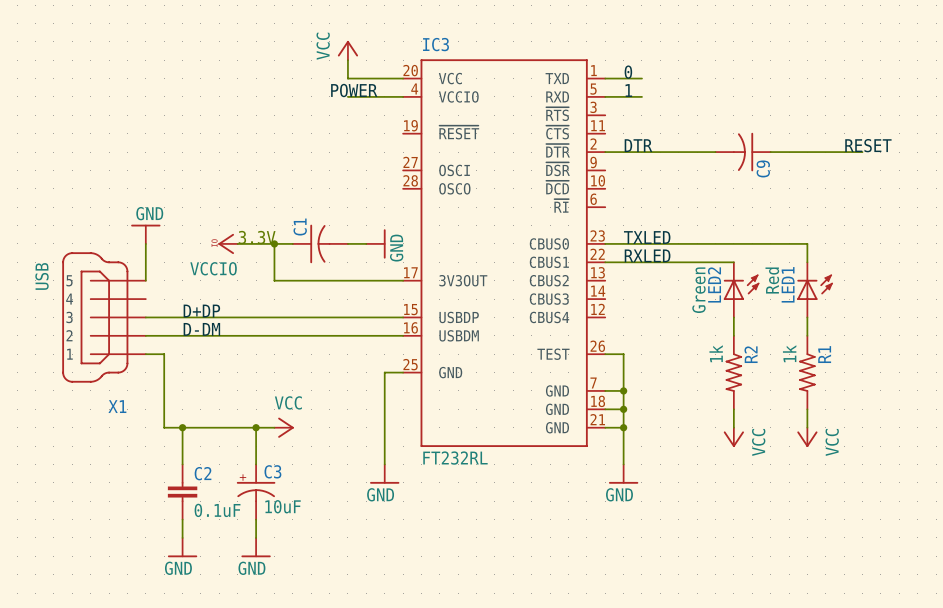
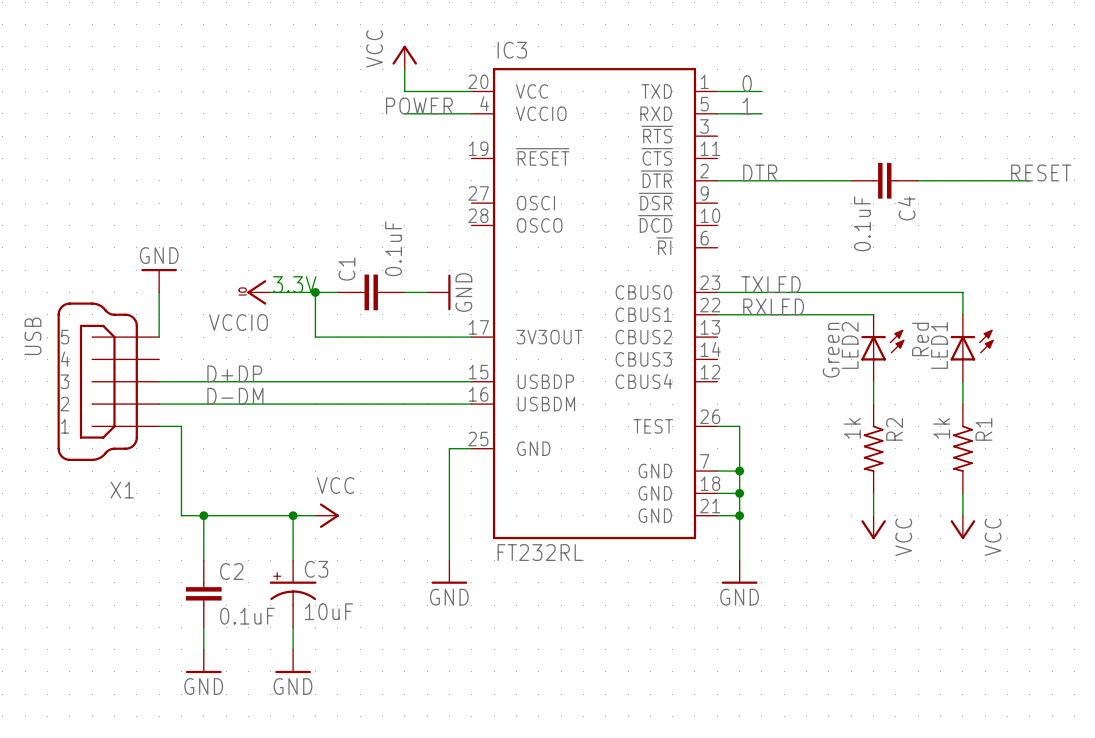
C9: (743, 152) -> none
C4: none -> 0.1uF (884, 180)
C1 value: none -> 0.1uF (393, 248)
C1 symbol: [292, 224, 348, 264] -> [337, 274, 405, 311]

